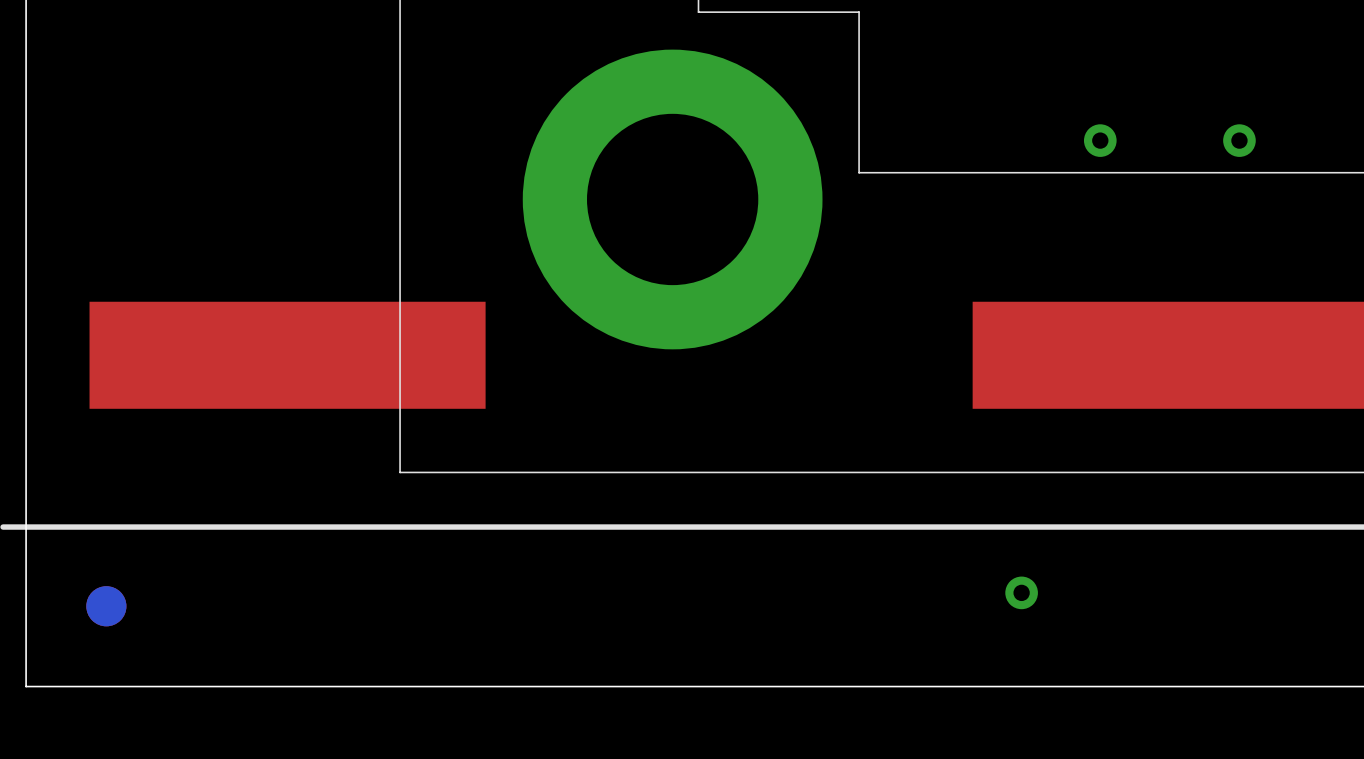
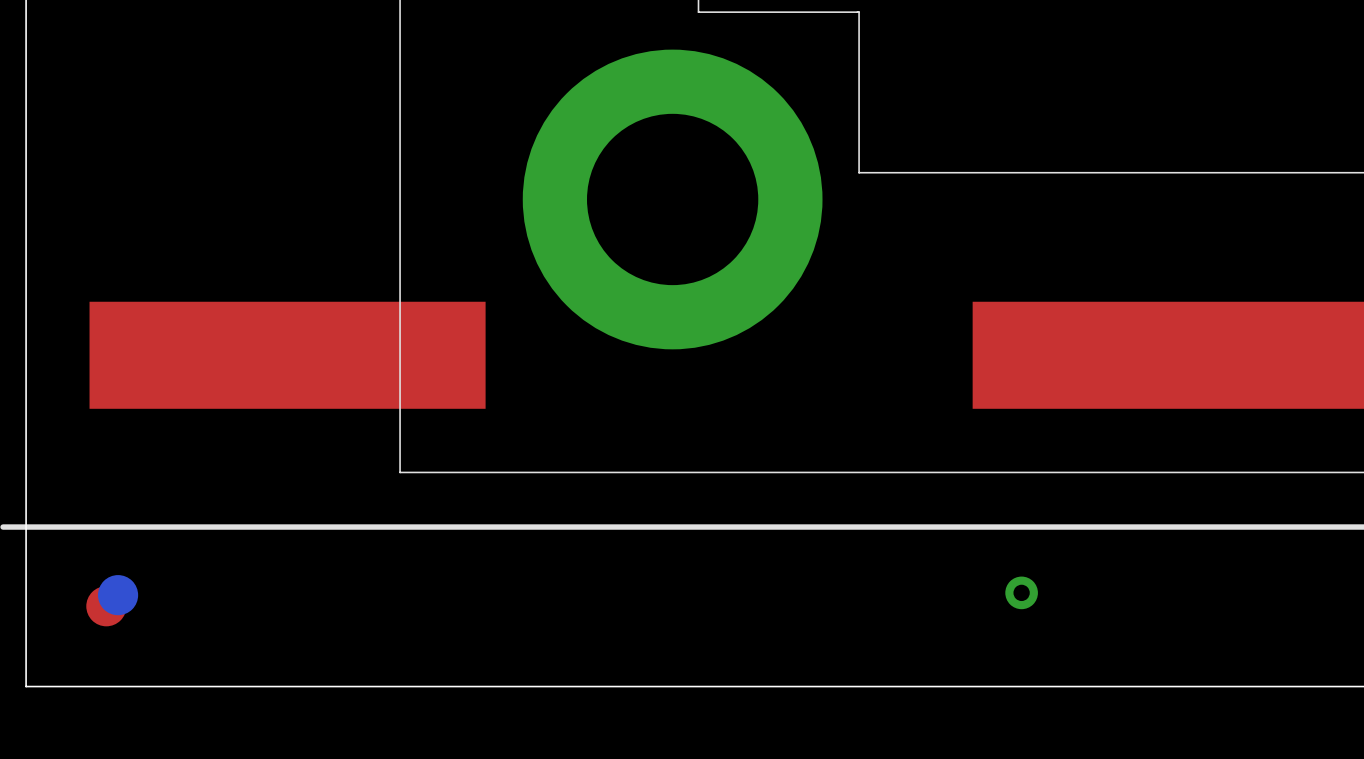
via: (1100, 140) -> none
via: (1239, 140) -> none
part position: (106, 606) -> (118, 595)

